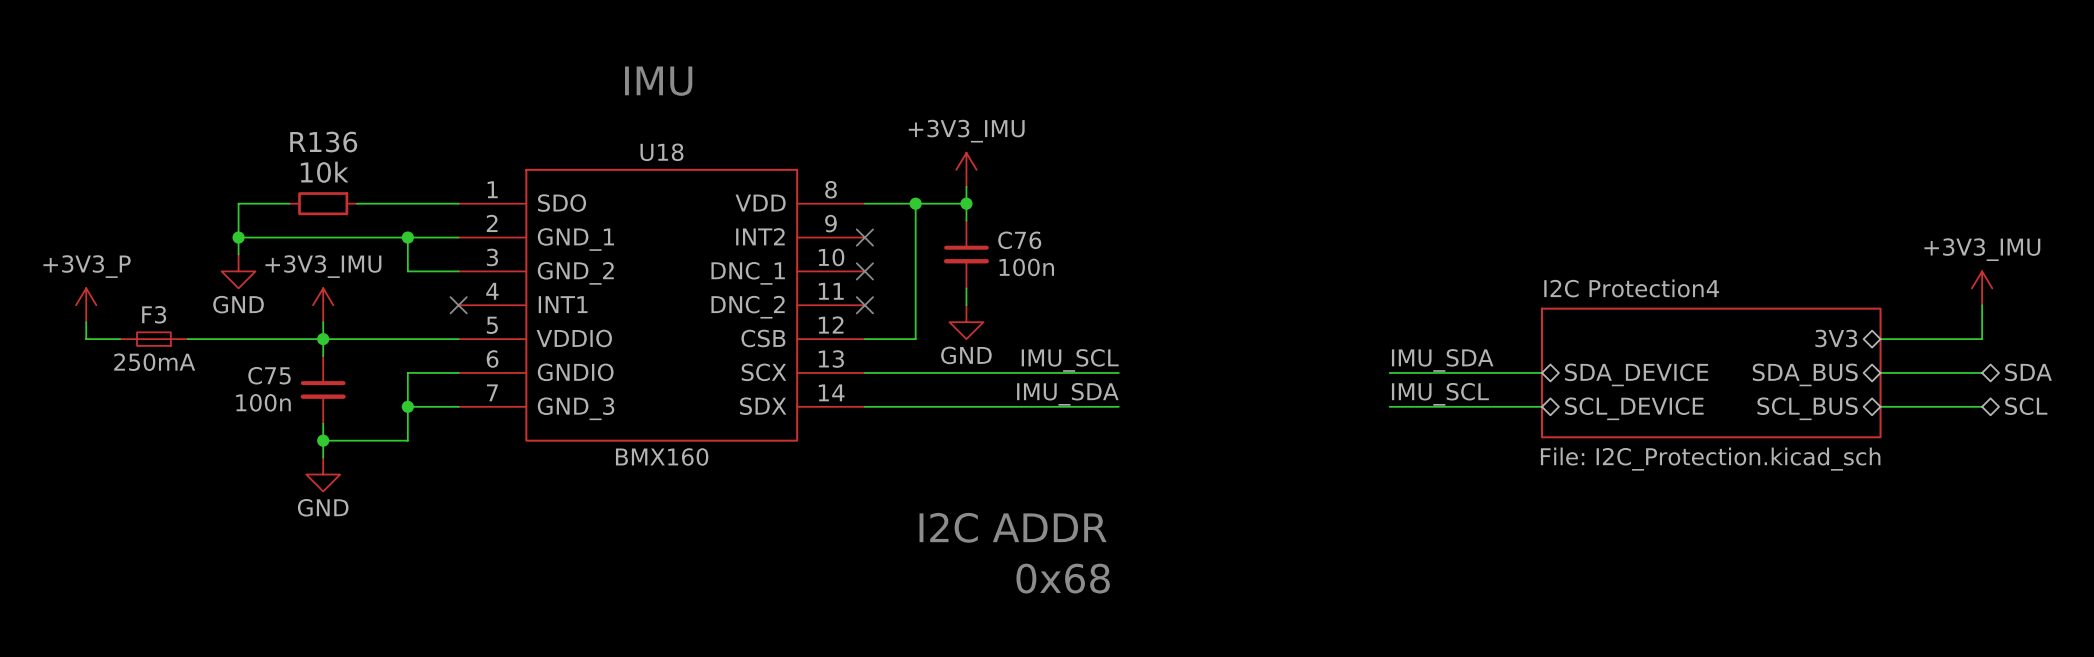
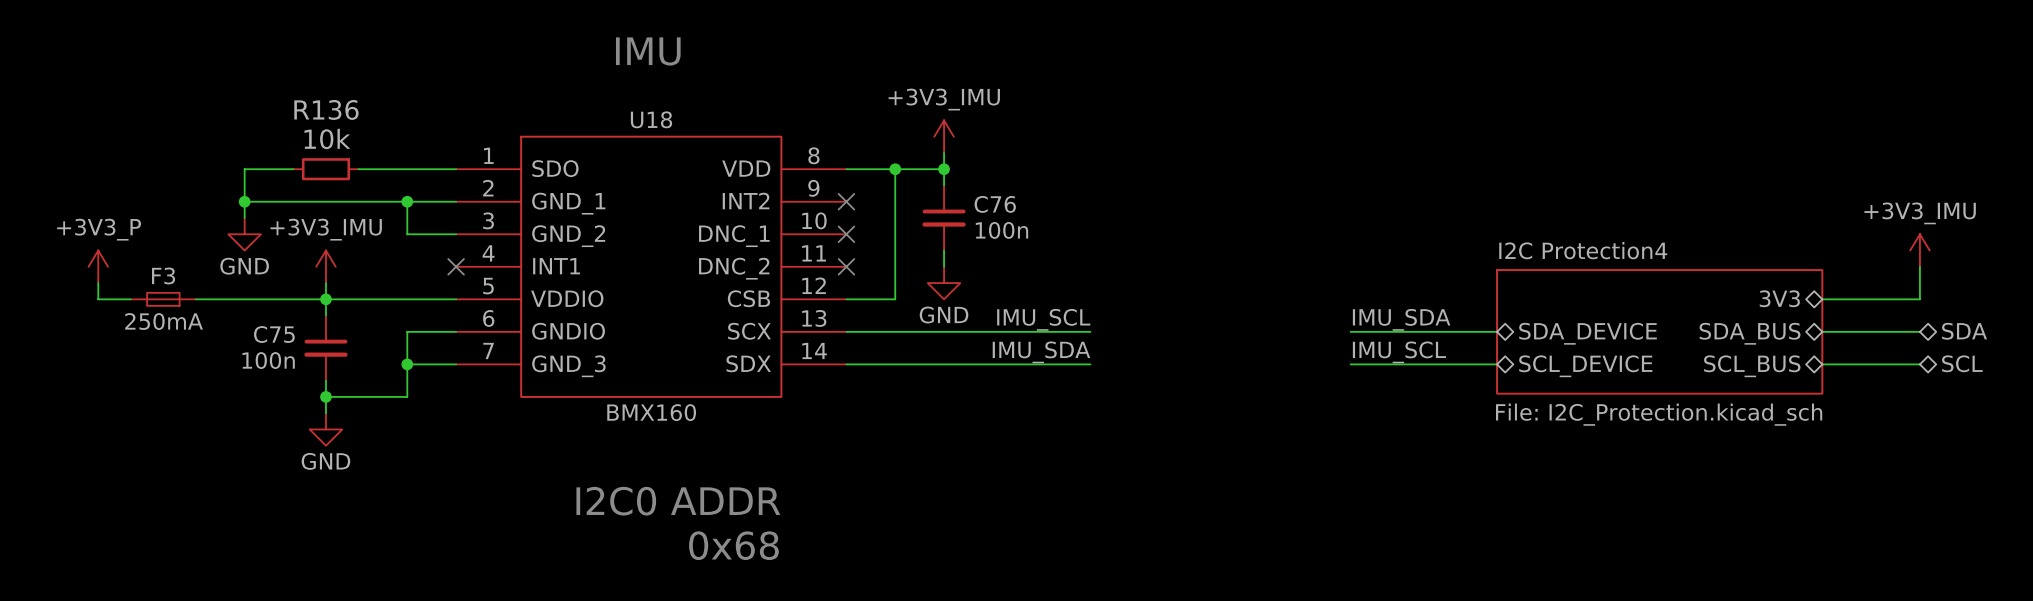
text: I2C ADDR (1013, 527) -> none
text: none -> I2C0 ADDR (678, 501)
text position: 0x68 (1063, 578) -> 0x68 (733, 545)

